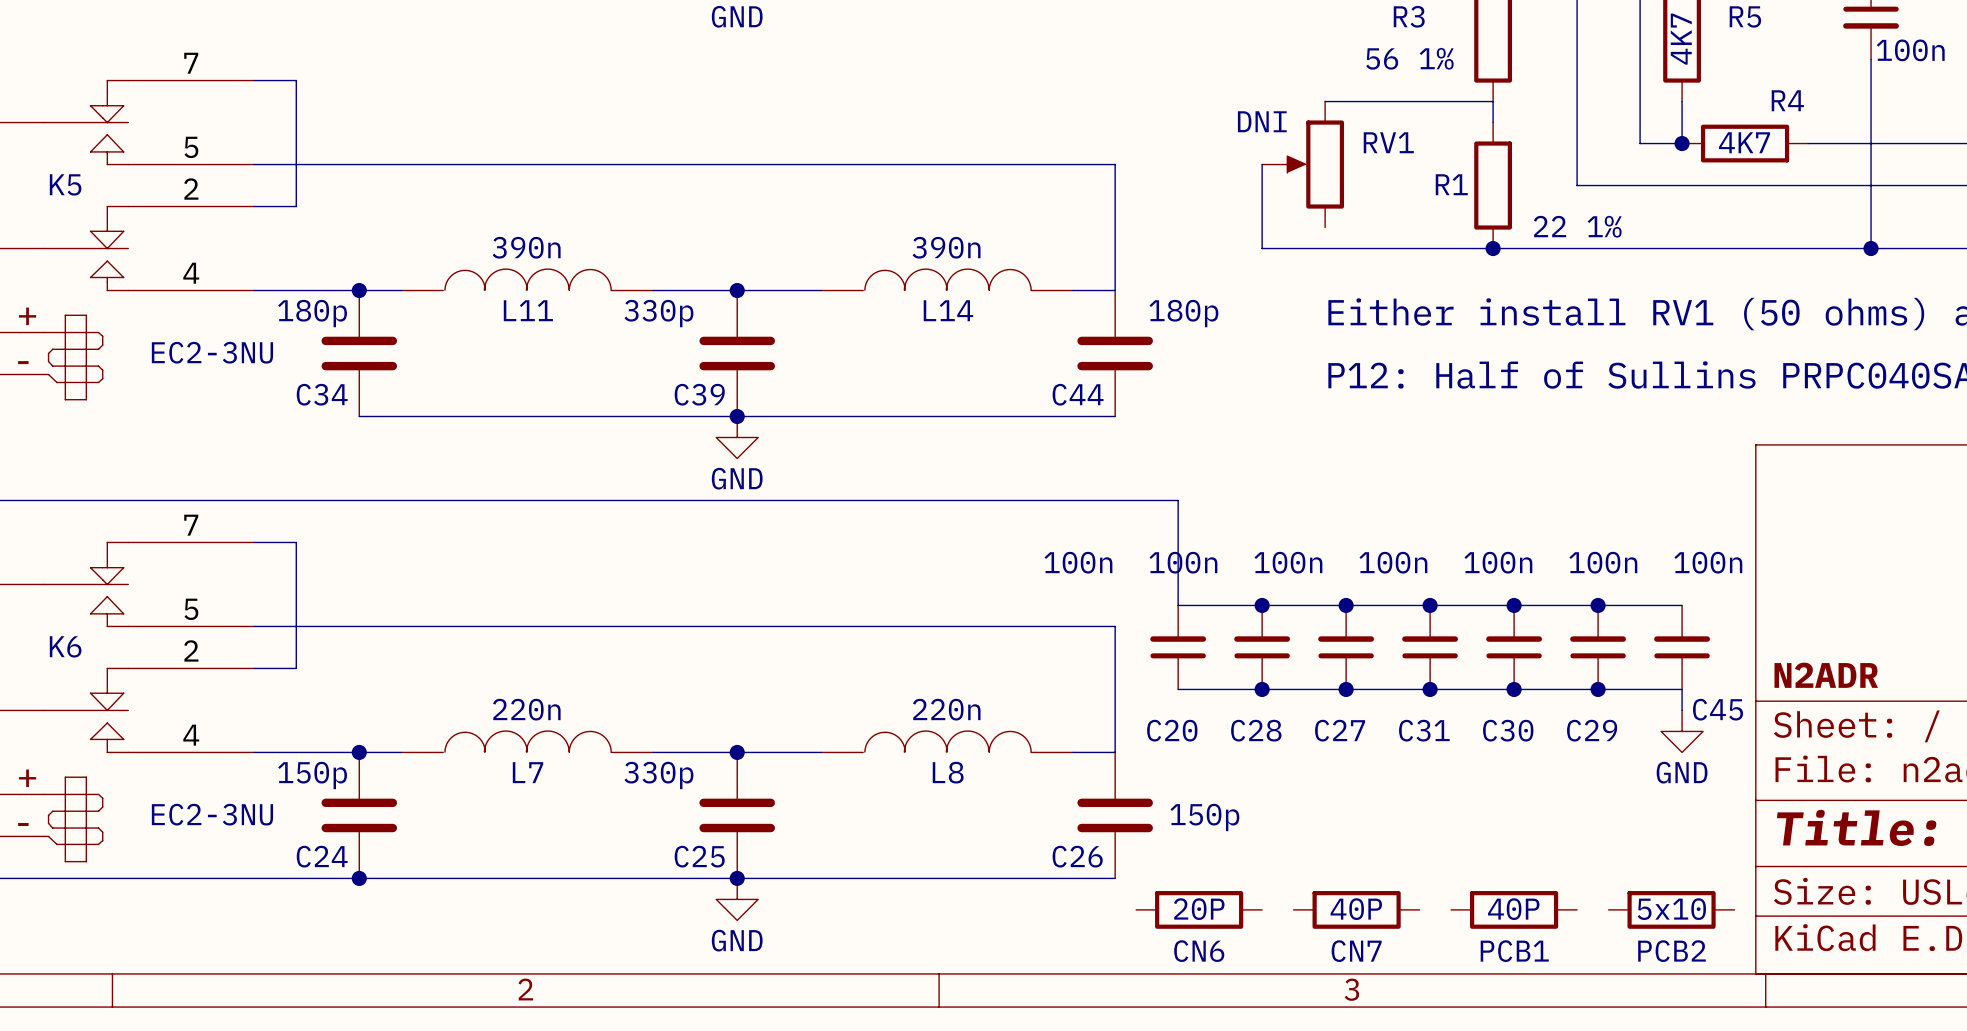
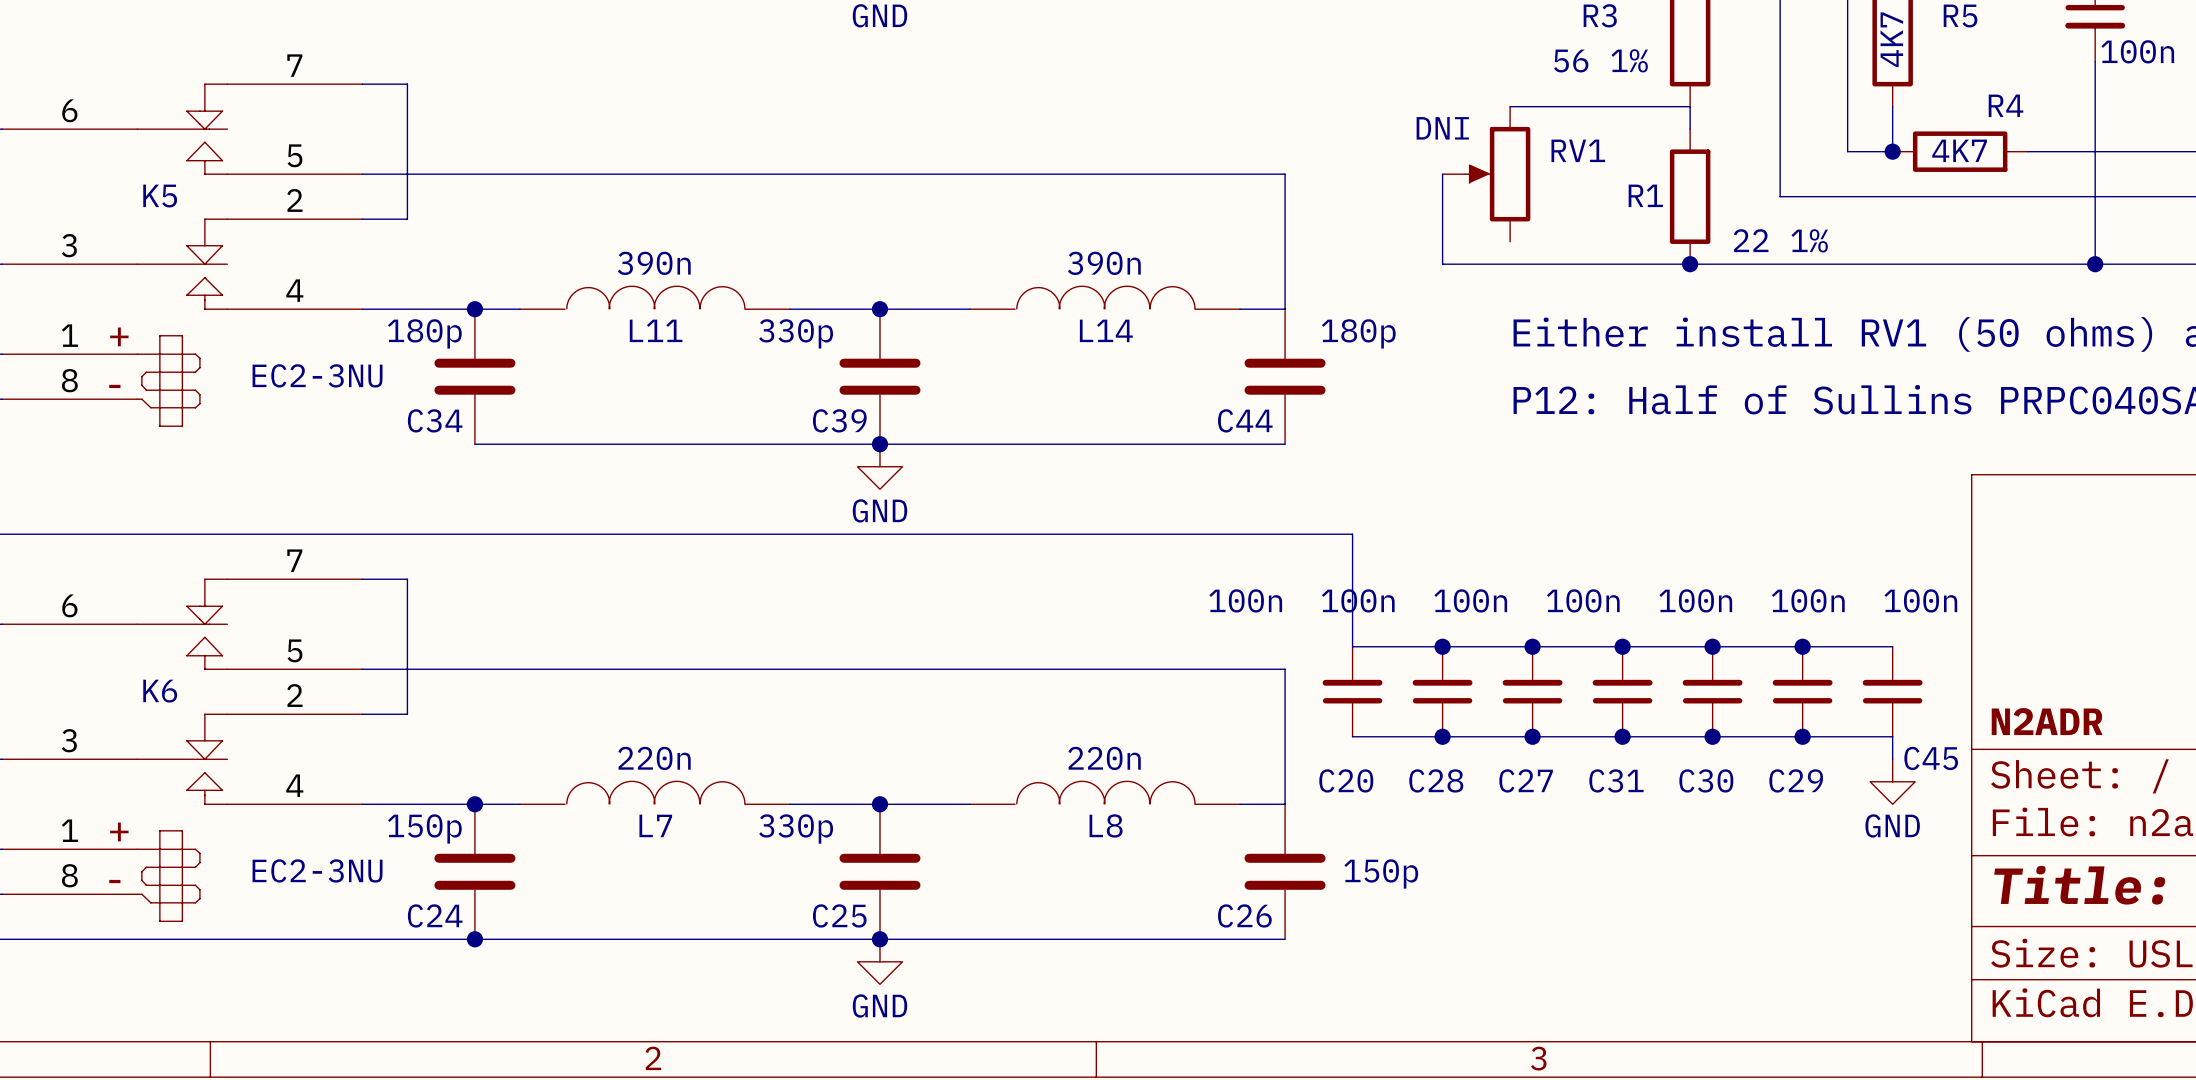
CN6: 20P (1199, 909) -> none
CN7: 40P (1356, 909) -> none
PCB1: 40P (1514, 909) -> none
PCB2: 5x10 (1671, 909) -> none

